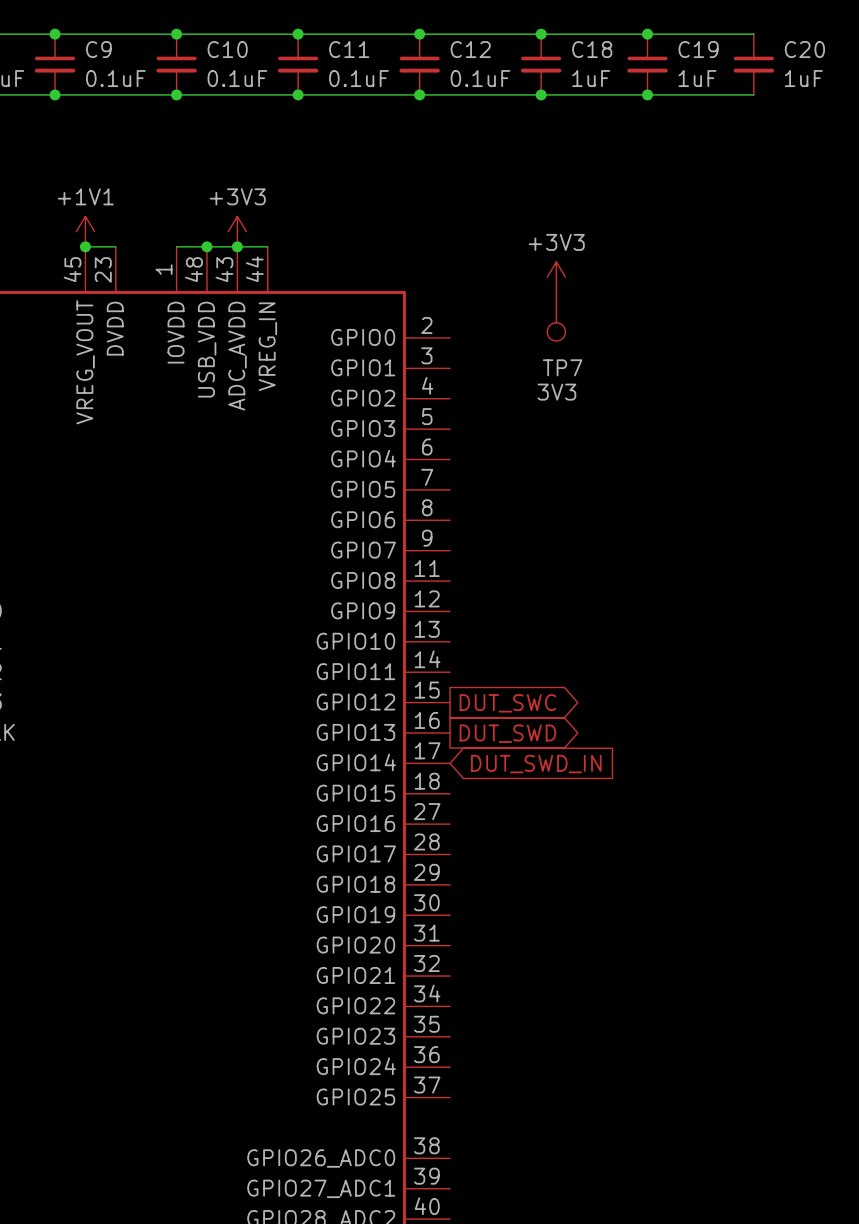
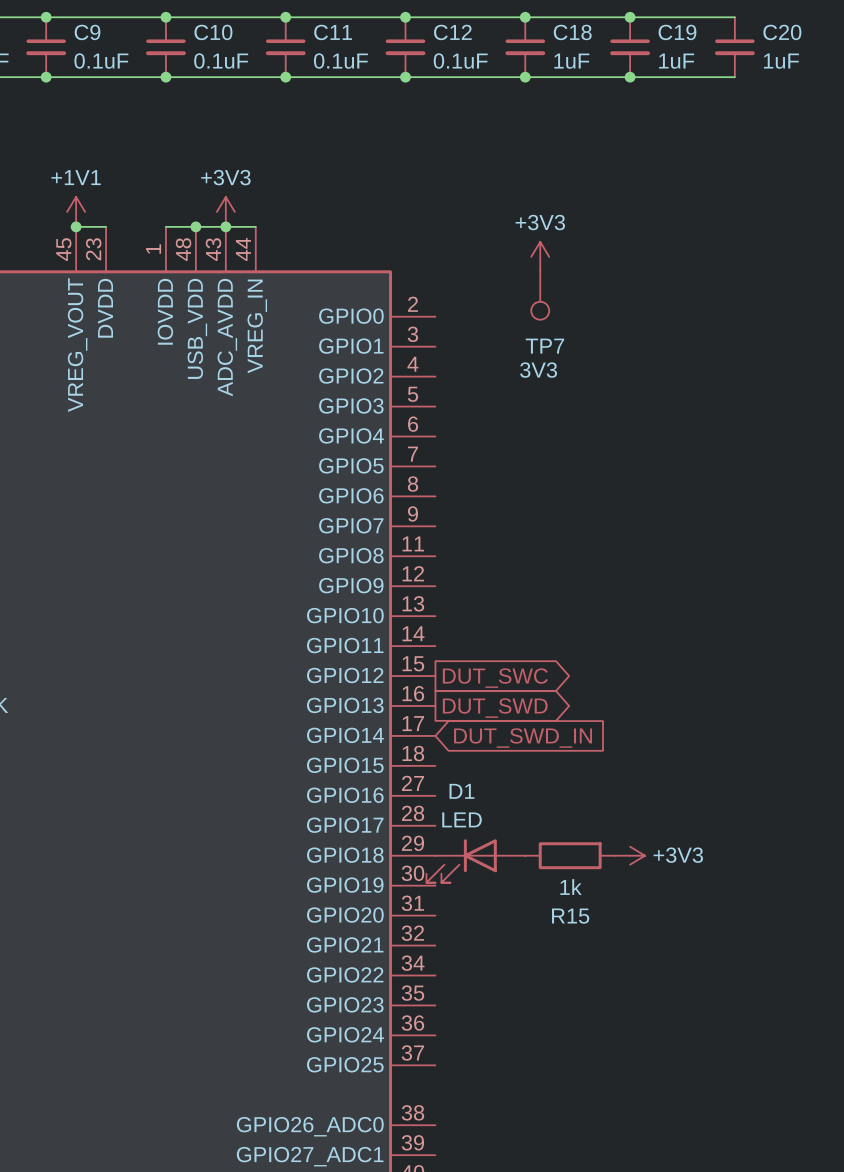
R15: none -> 1k (570, 855)
power symbol: none -> +3V3 (630, 855)
D1: none -> LED (475, 860)

